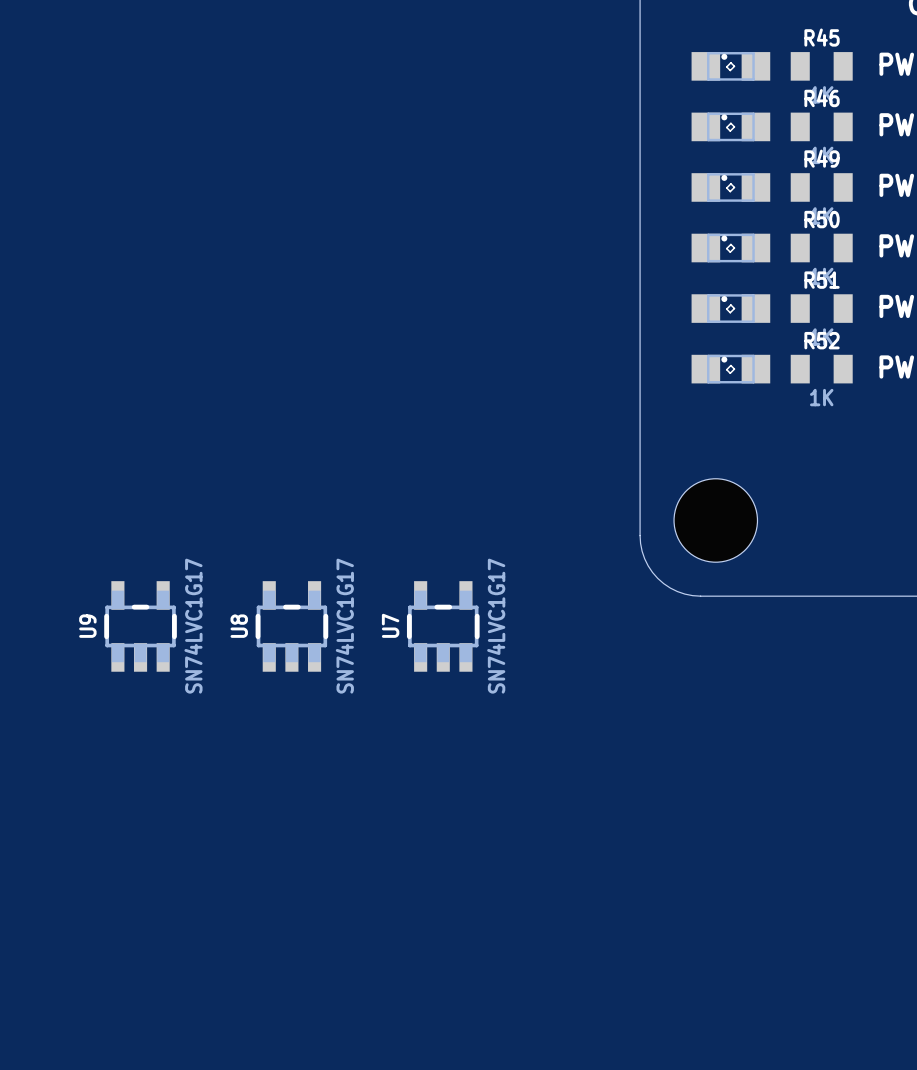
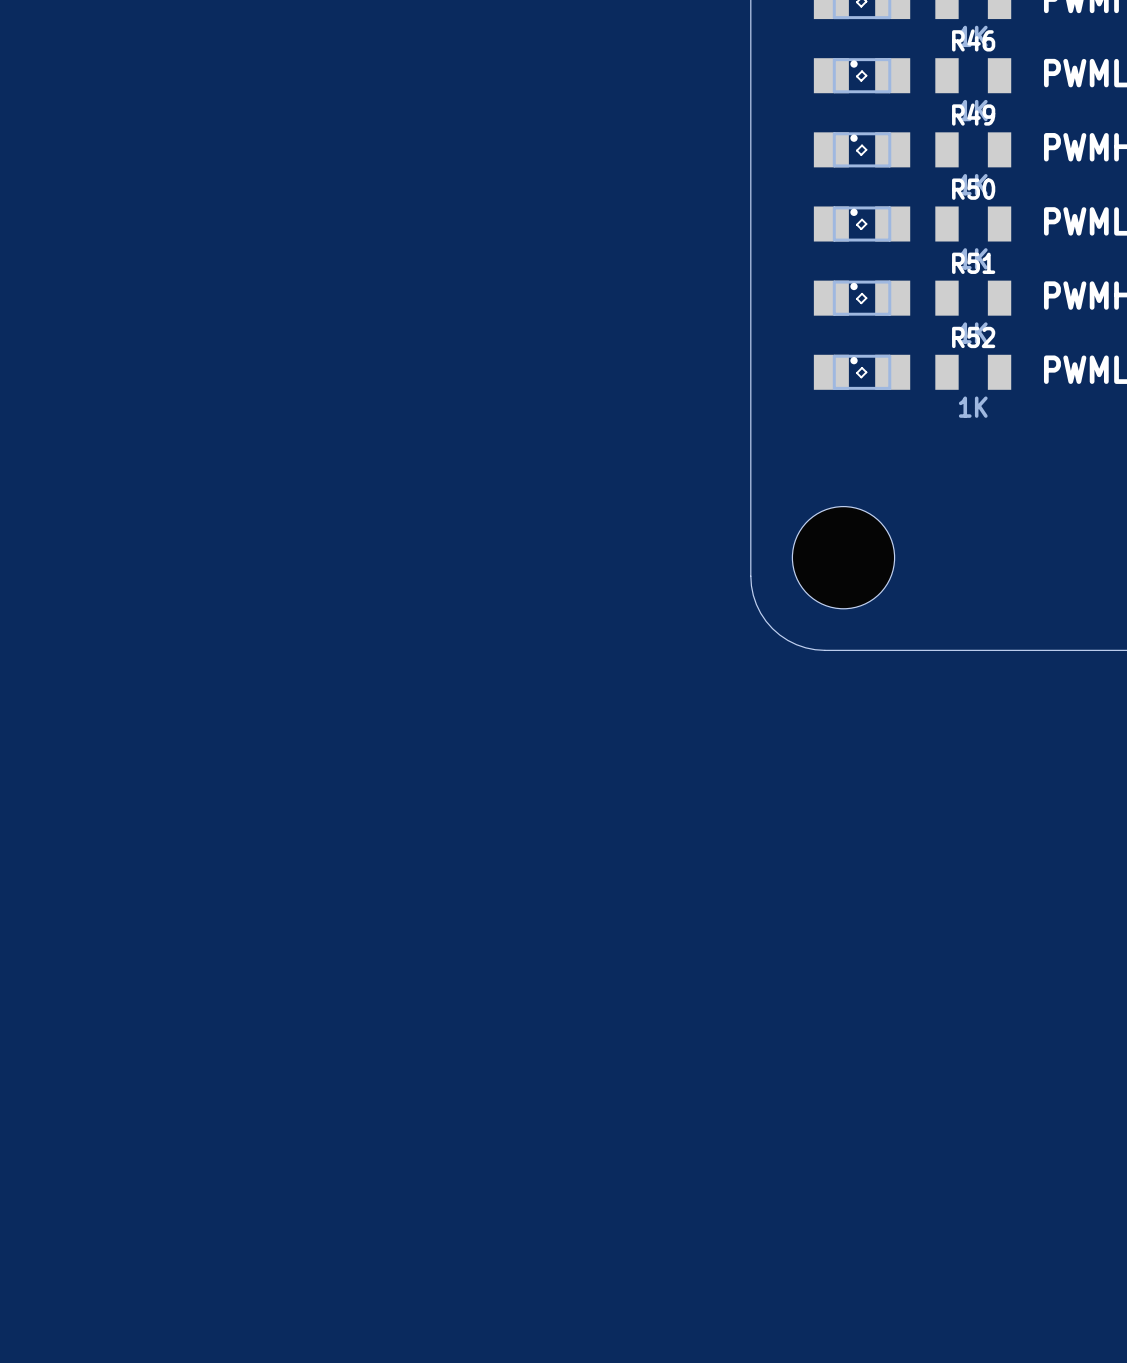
U9: SN74LVC1G17 (140, 626) -> none
U8: SN74LVC1G17 (291, 626) -> none
U7: SN74LVC1G17 (443, 626) -> none

